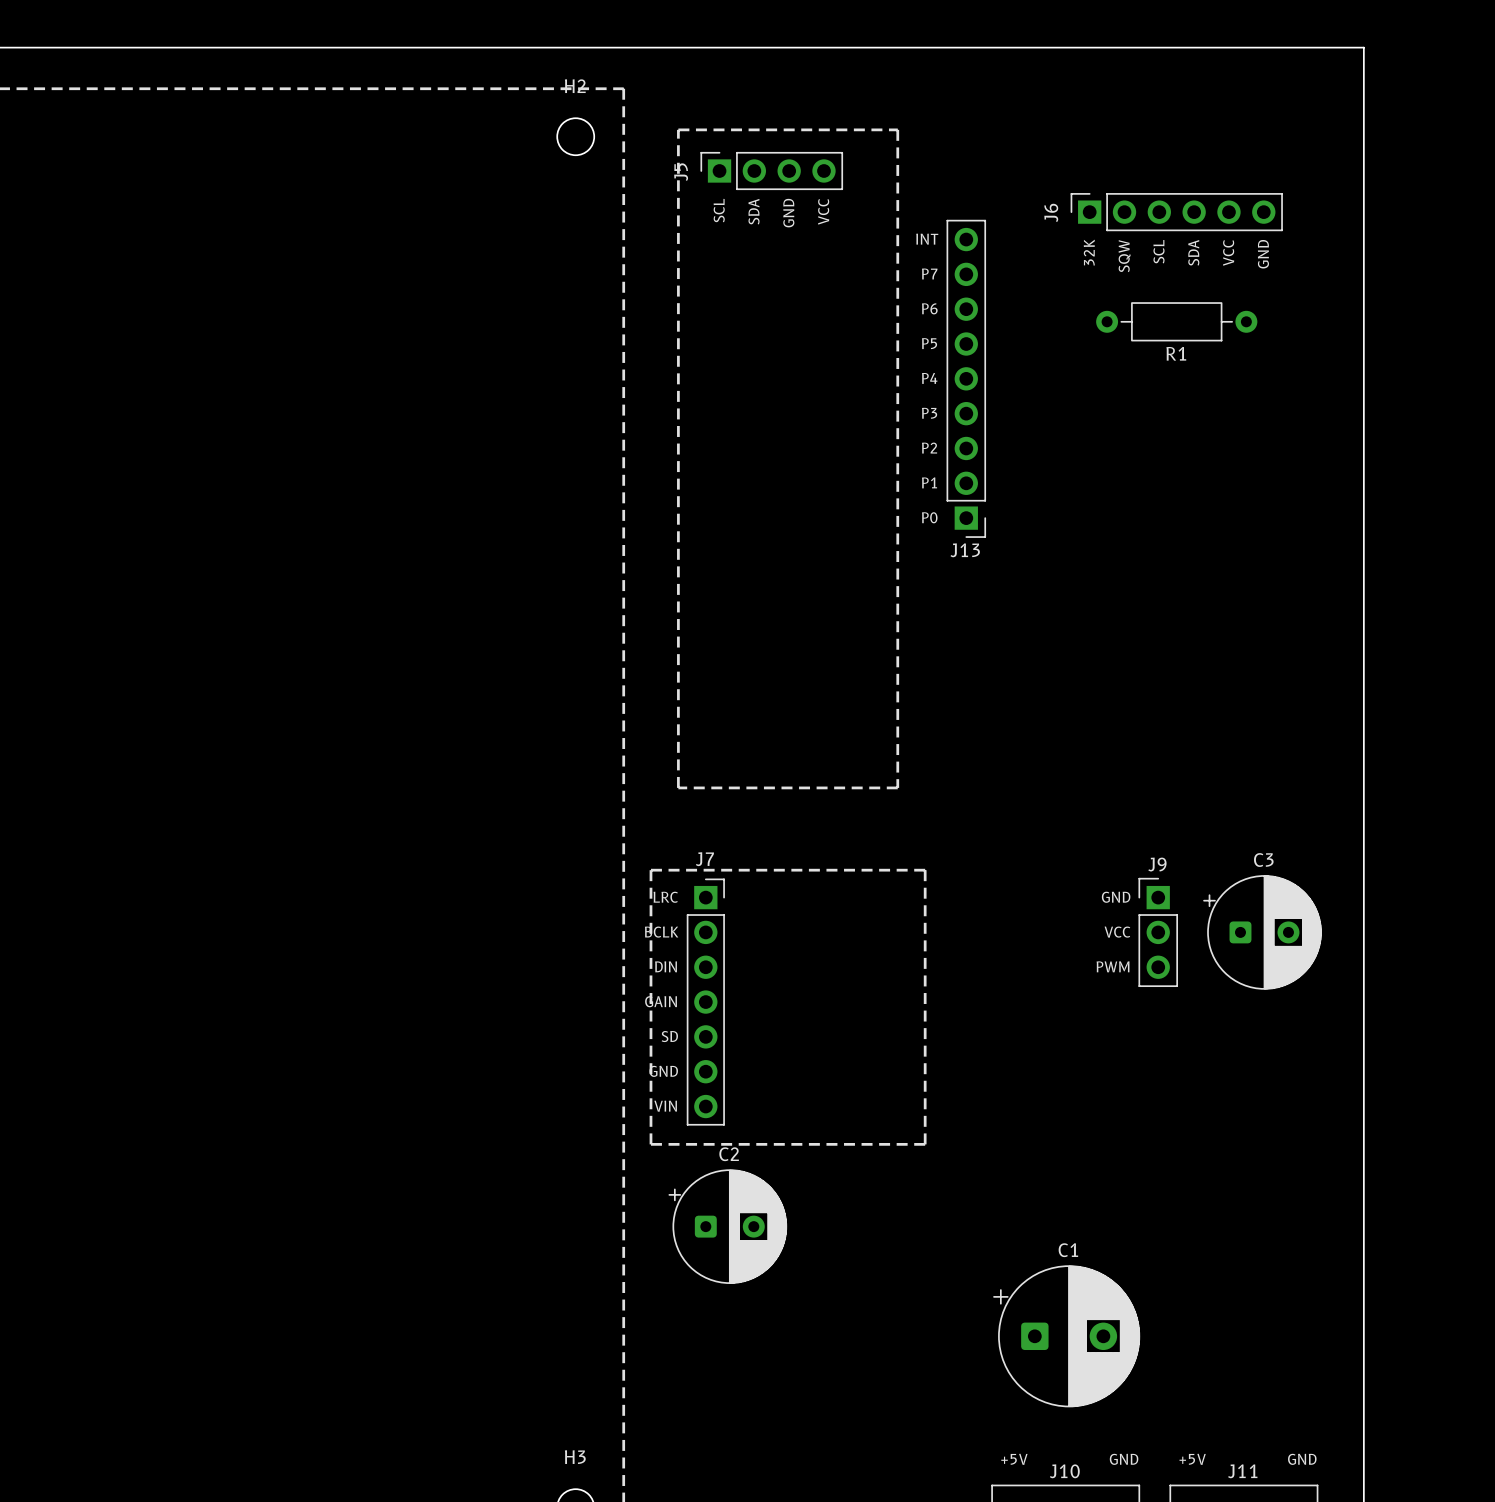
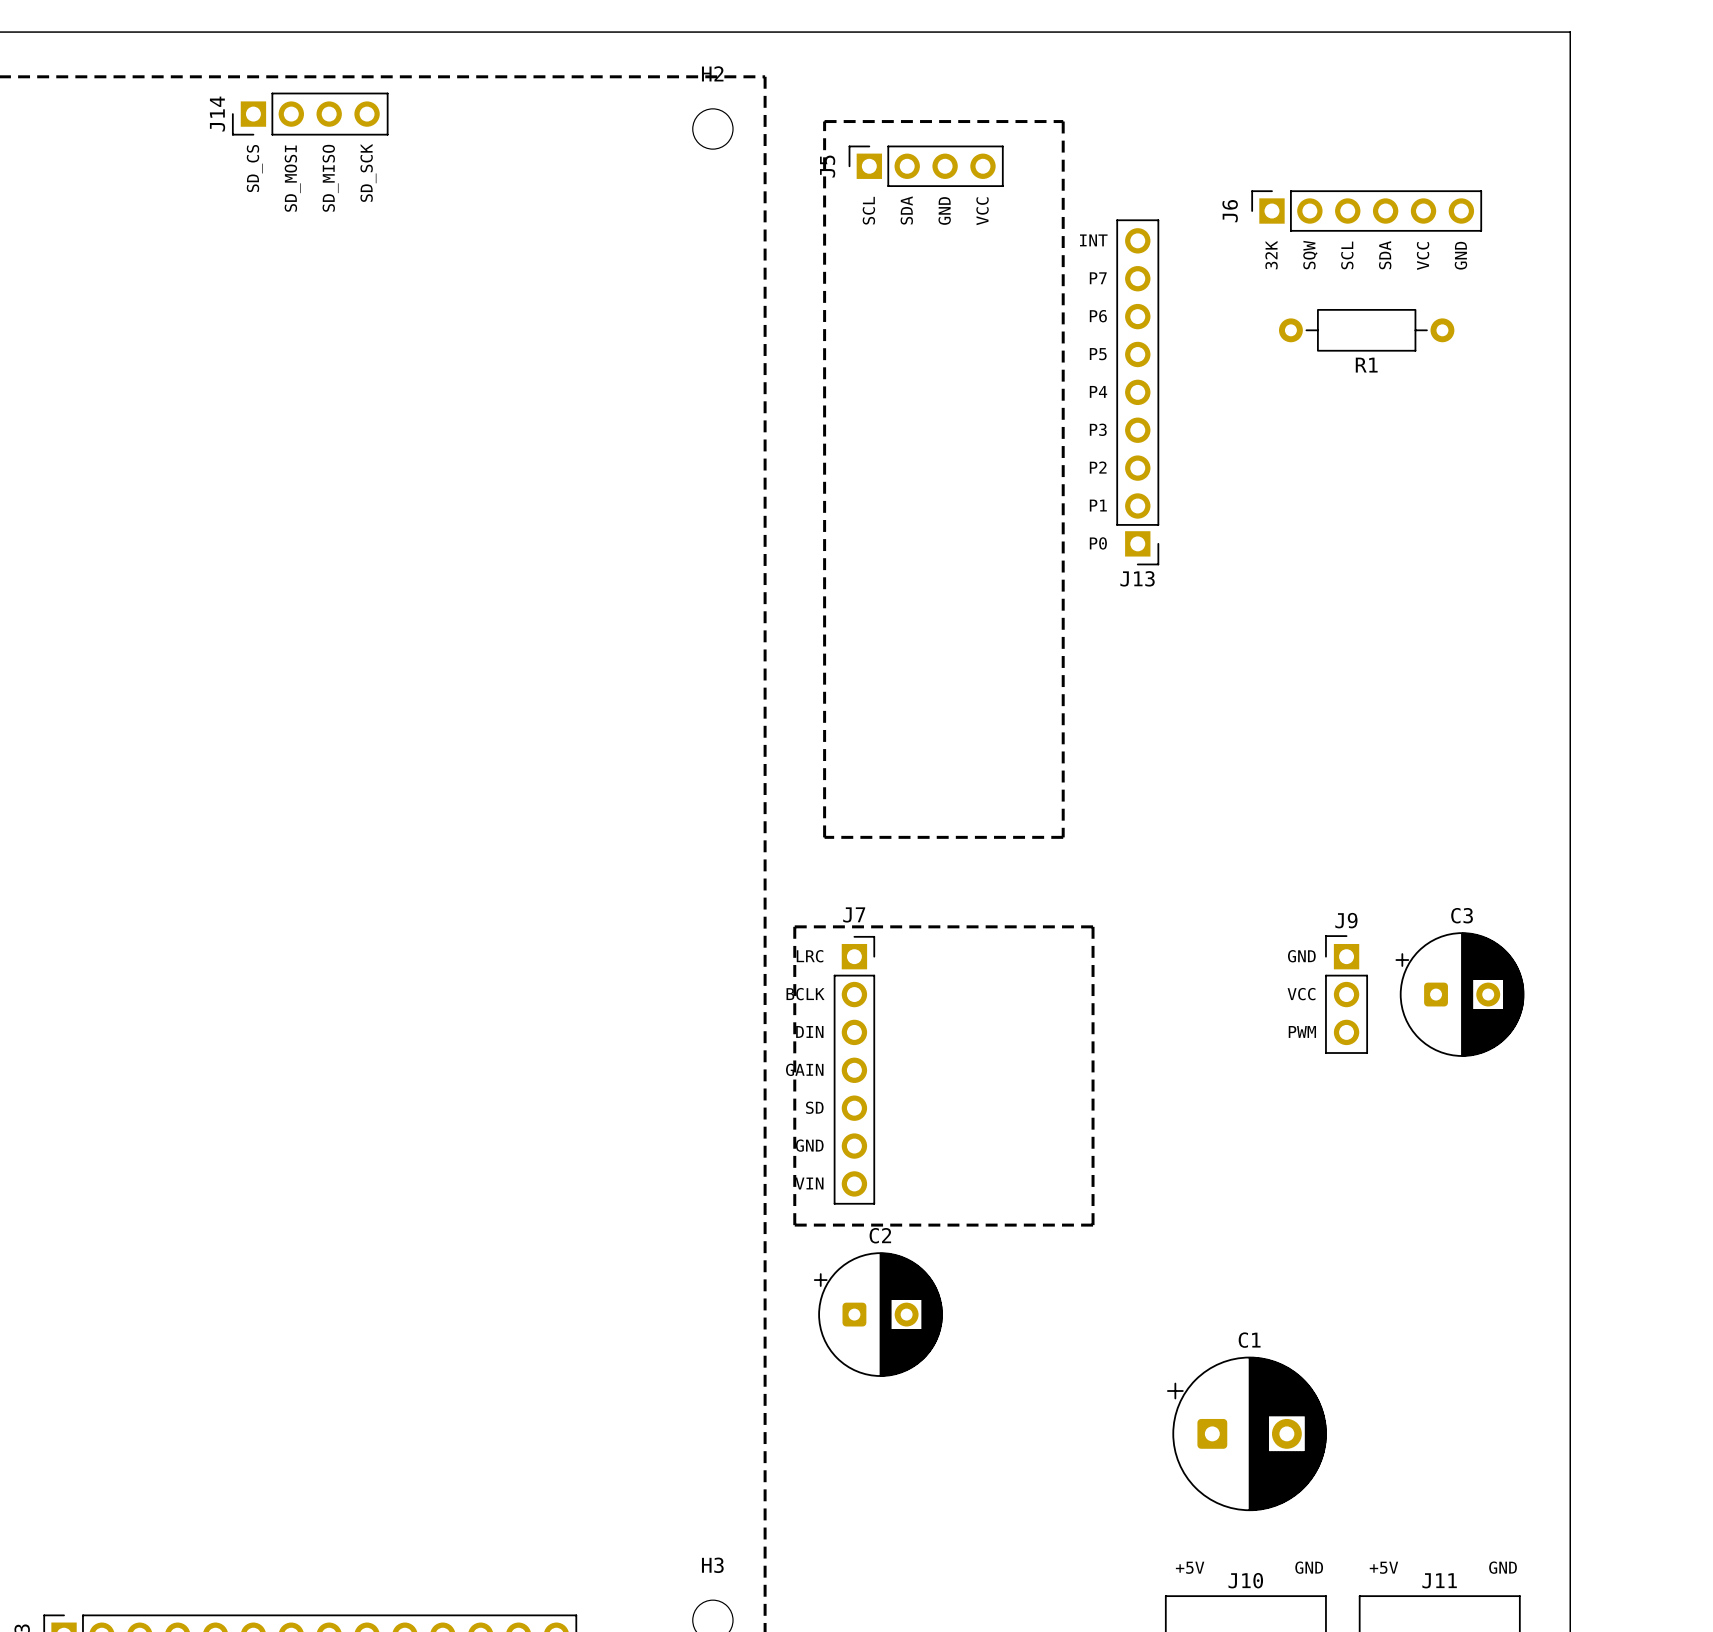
J14: none -> (310, 114)
text: none -> SD_CS (254, 168)
text: none -> SD_SCK (368, 172)
text: none -> SD_MOSI (292, 178)
text: none -> SD_MISO (330, 178)

